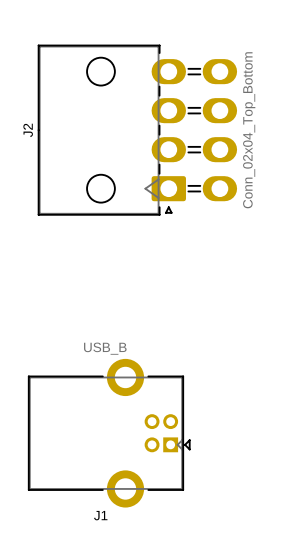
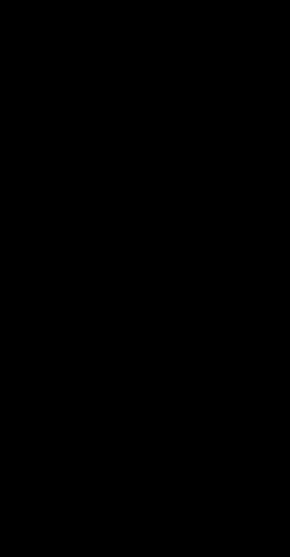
J2: Conn_02x04_Top_Bottom (137, 130) -> none
J1: USB_B (109, 433) -> none

